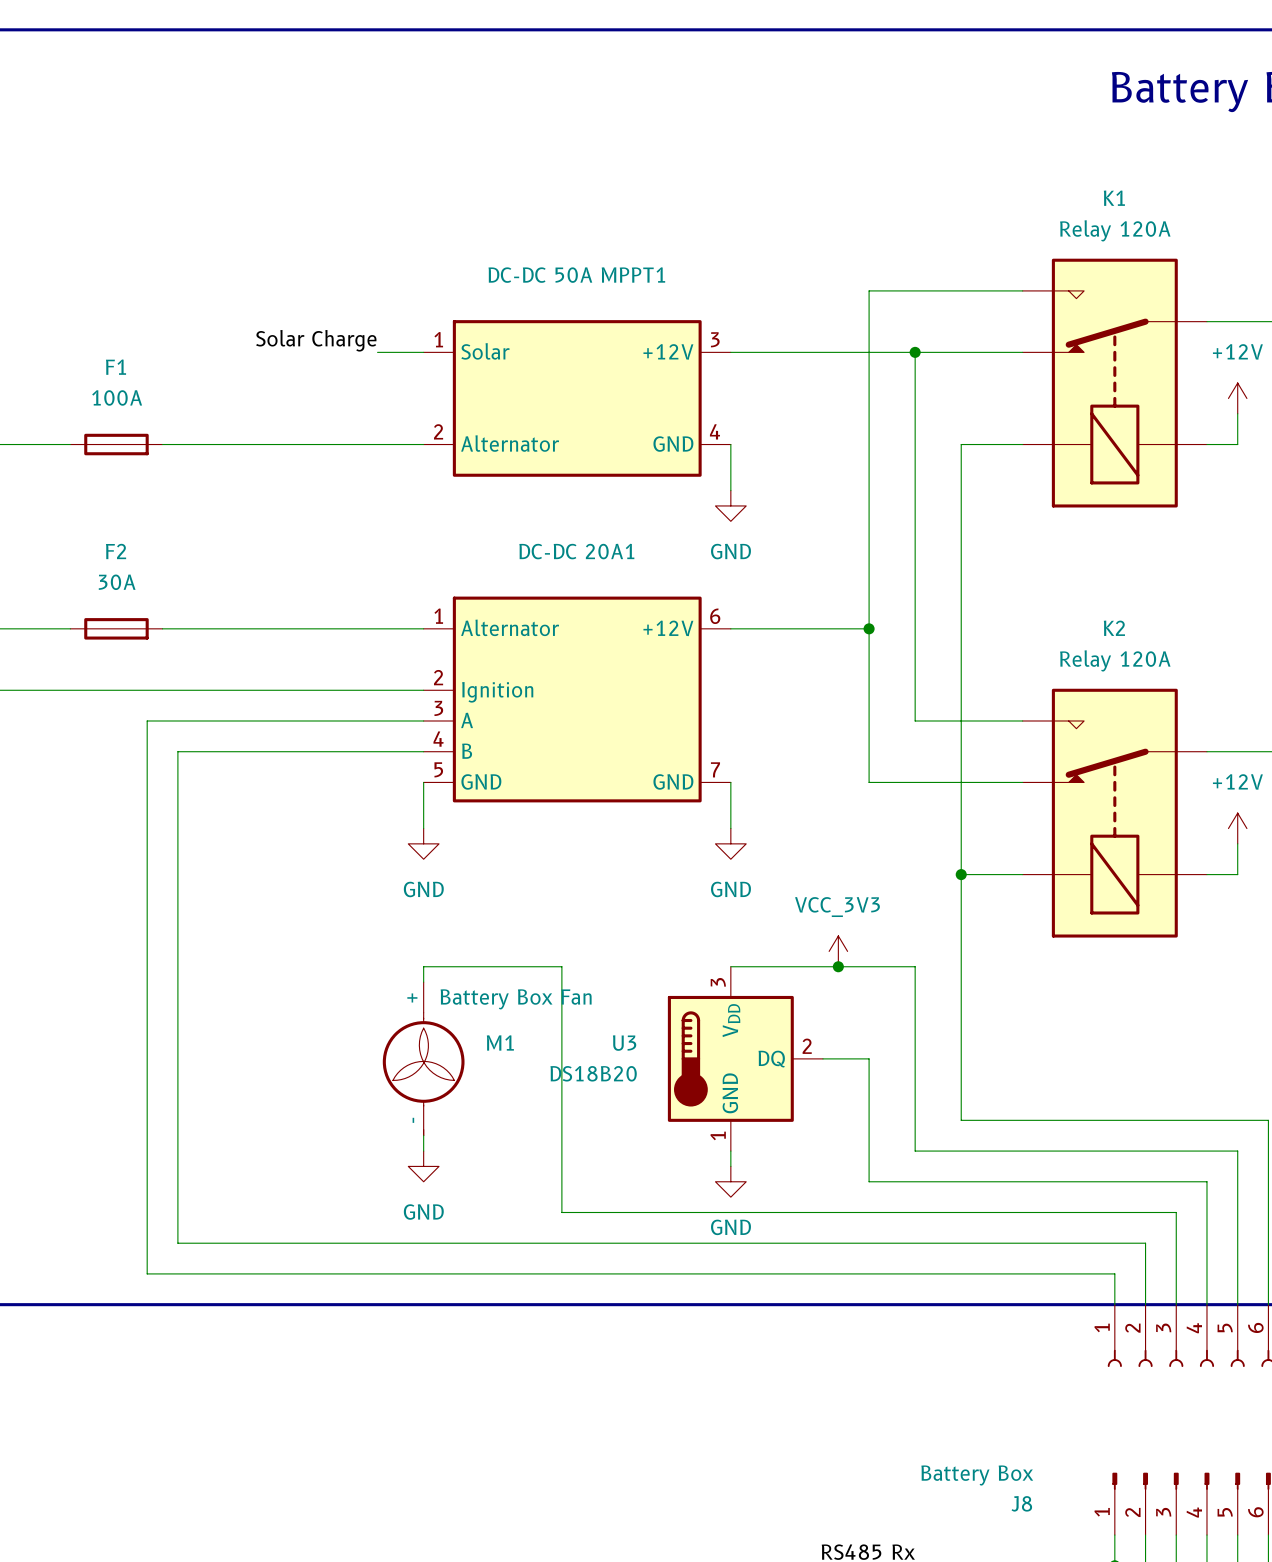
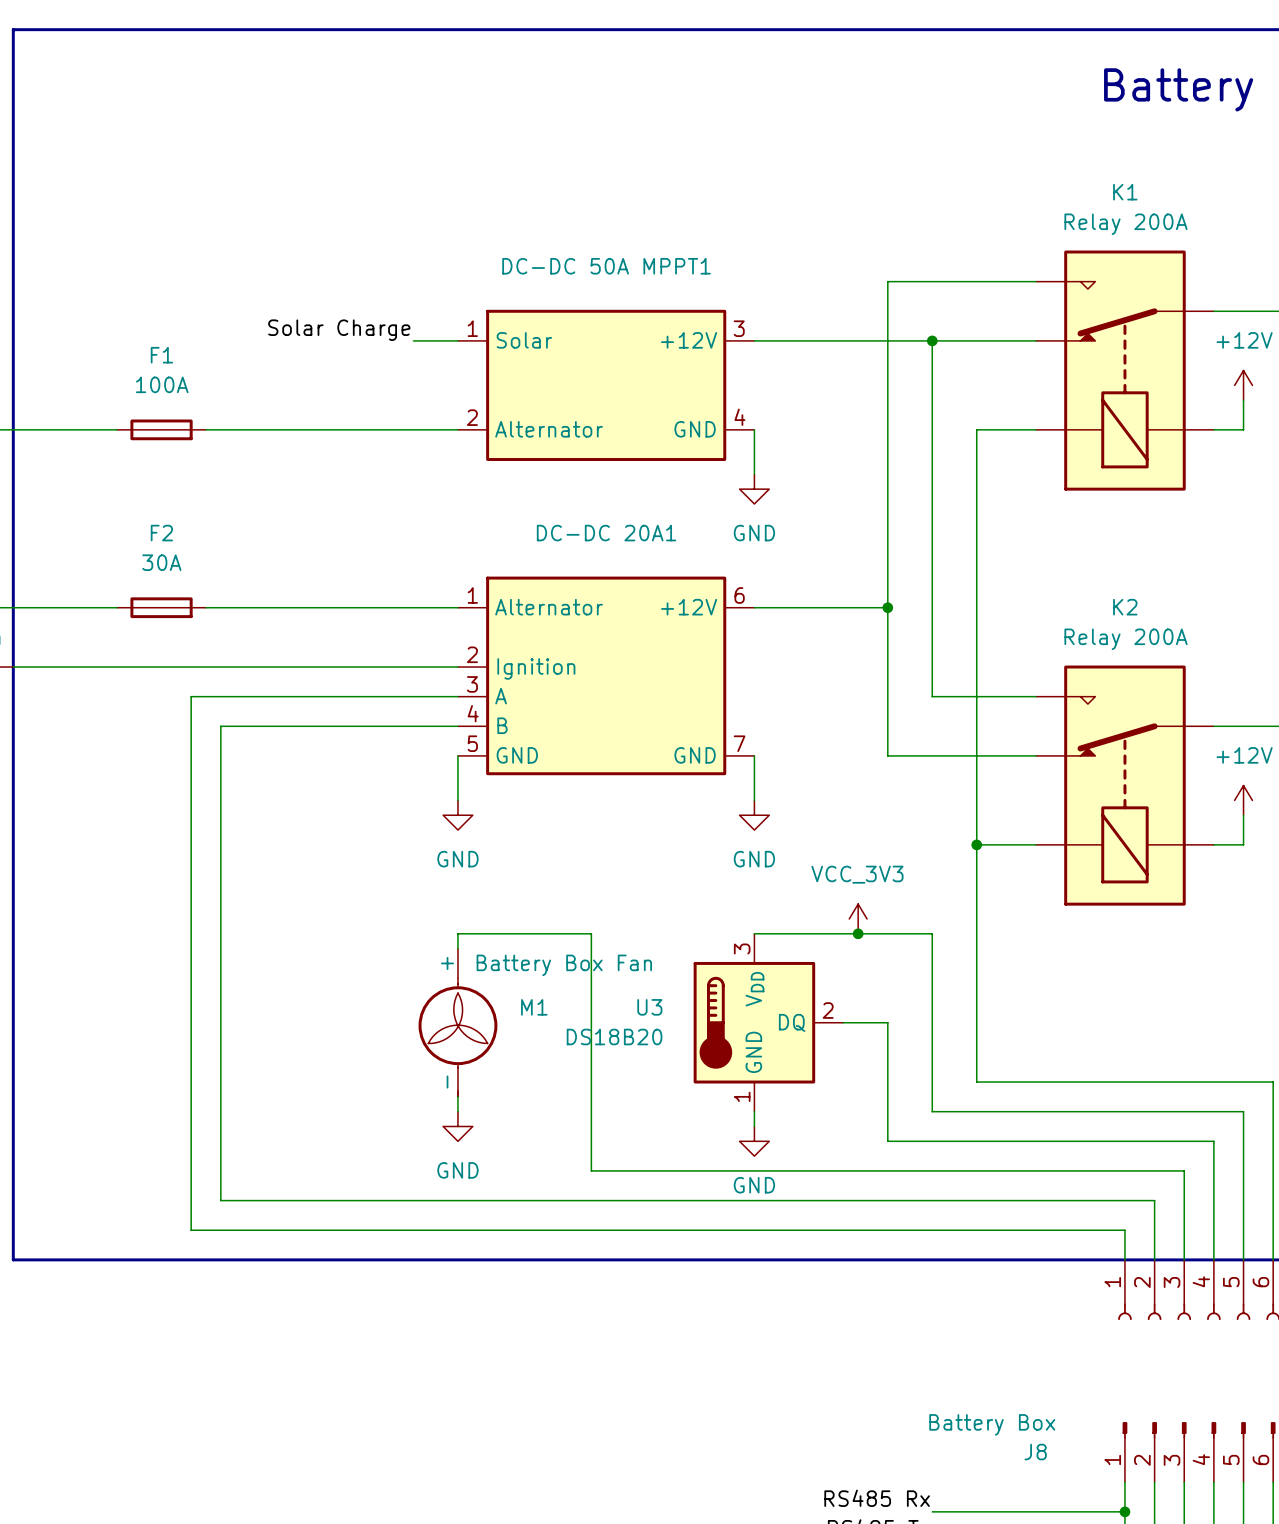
K1 value: Relay 120A (1115, 230) -> Relay 200A (1126, 224)
K2 value: Relay 120A (1115, 660) -> Relay 200A (1126, 639)

